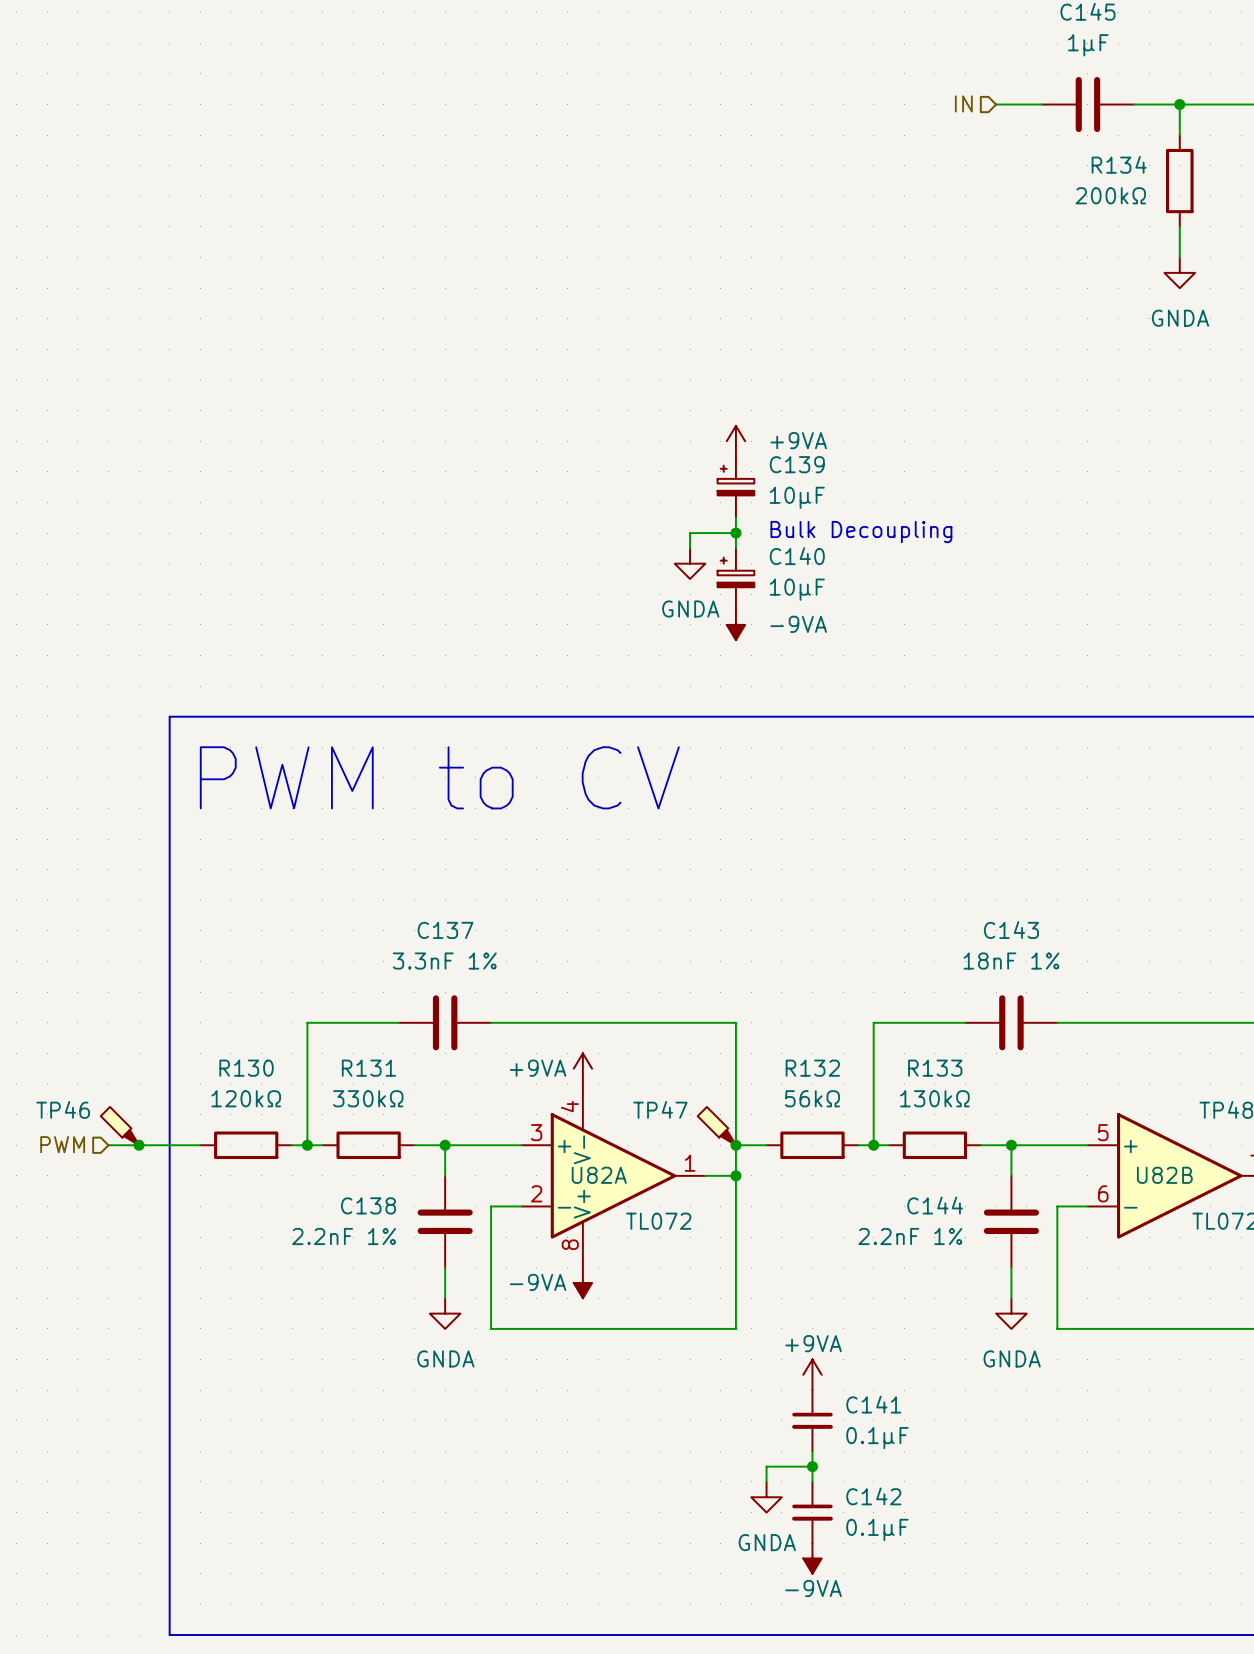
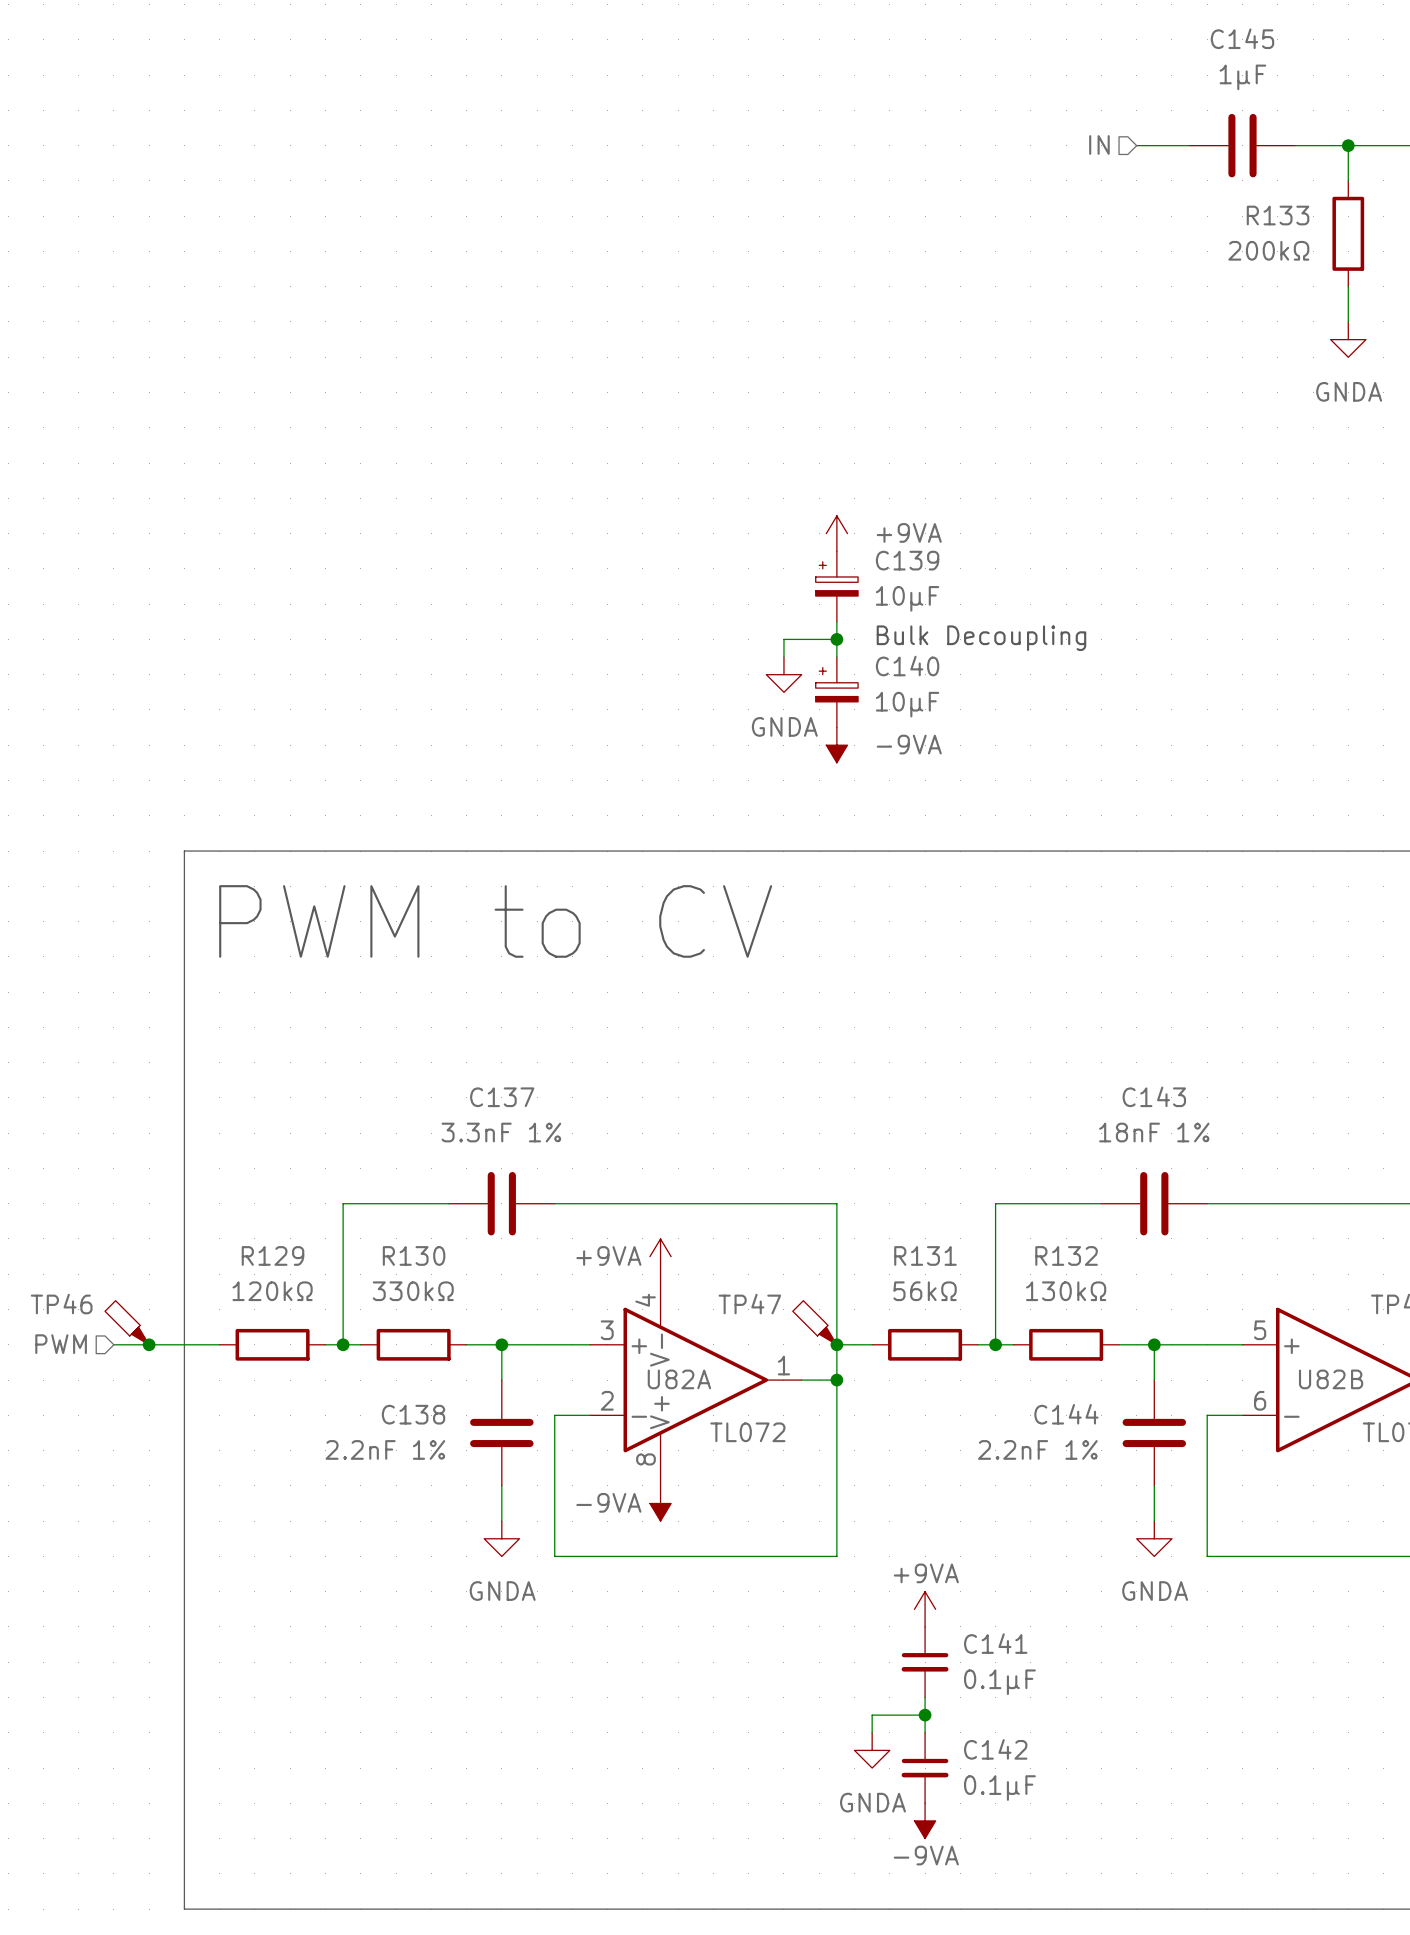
R134 name: R134 (1119, 164) -> R133 (1278, 215)
R130 name: R130 (246, 1068) -> R129 (272, 1255)
R131 name: R131 (368, 1068) -> R130 (414, 1255)
R132 name: R132 (812, 1068) -> R131 (925, 1255)
R133 name: R133 (935, 1068) -> R132 (1066, 1255)

